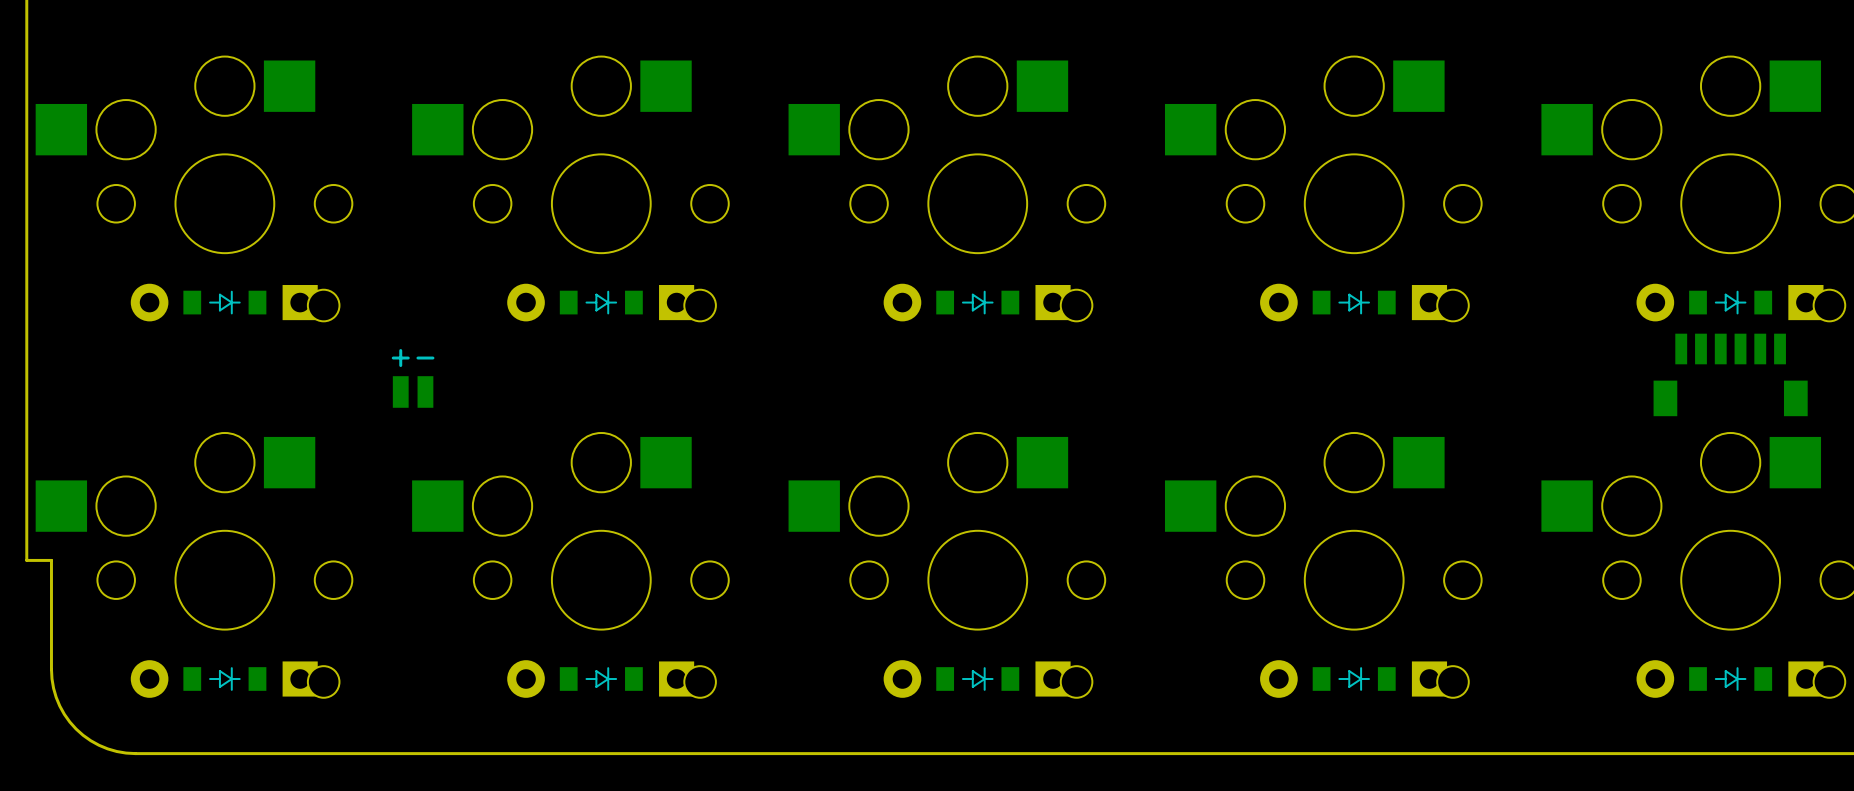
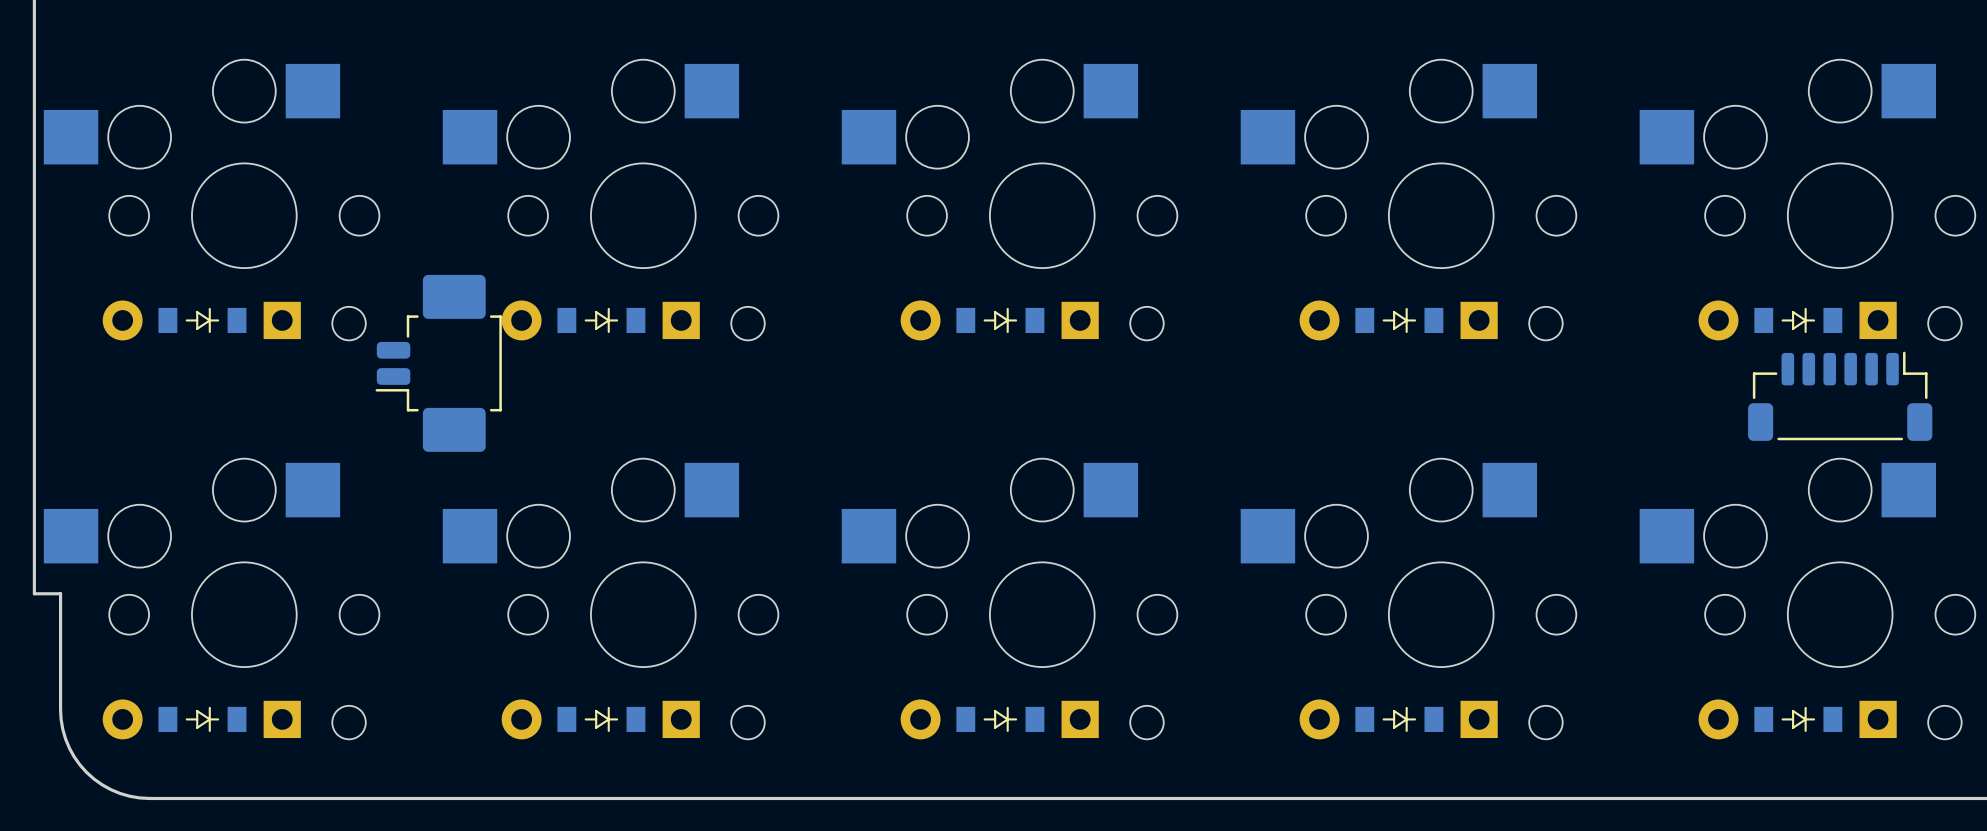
part position: (224, 302) -> (201, 320)
part position: (600, 302) -> (600, 320)
part position: (977, 302) -> (999, 320)
part position: (1353, 302) -> (1398, 320)
part position: (1730, 302) -> (1797, 320)
part footprint: [1653, 333, 1808, 417] -> [1748, 351, 1933, 441]
part: none -> (438, 363)
part: (413, 391) -> none
part position: (224, 679) -> (201, 719)
part position: (600, 679) -> (600, 719)
part position: (977, 679) -> (999, 719)
part position: (1353, 679) -> (1398, 719)
part position: (1730, 679) -> (1797, 719)

